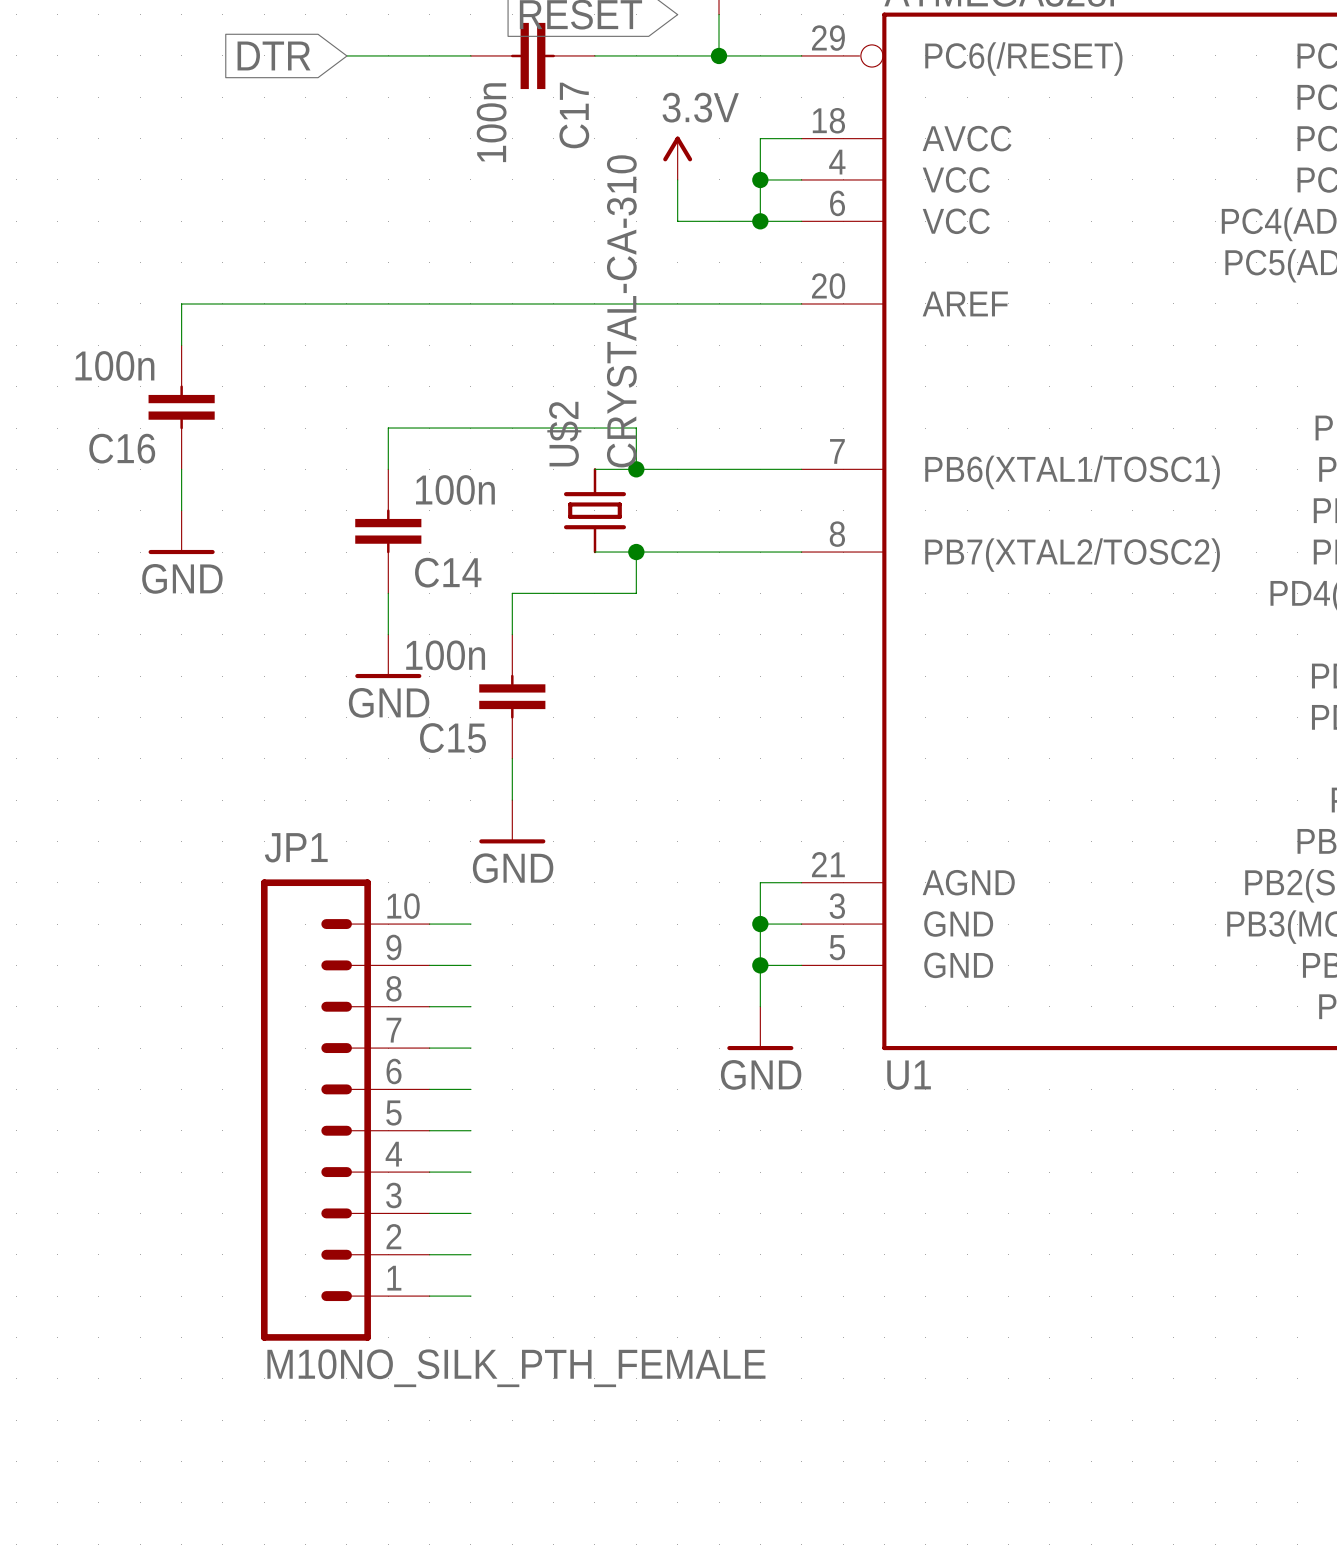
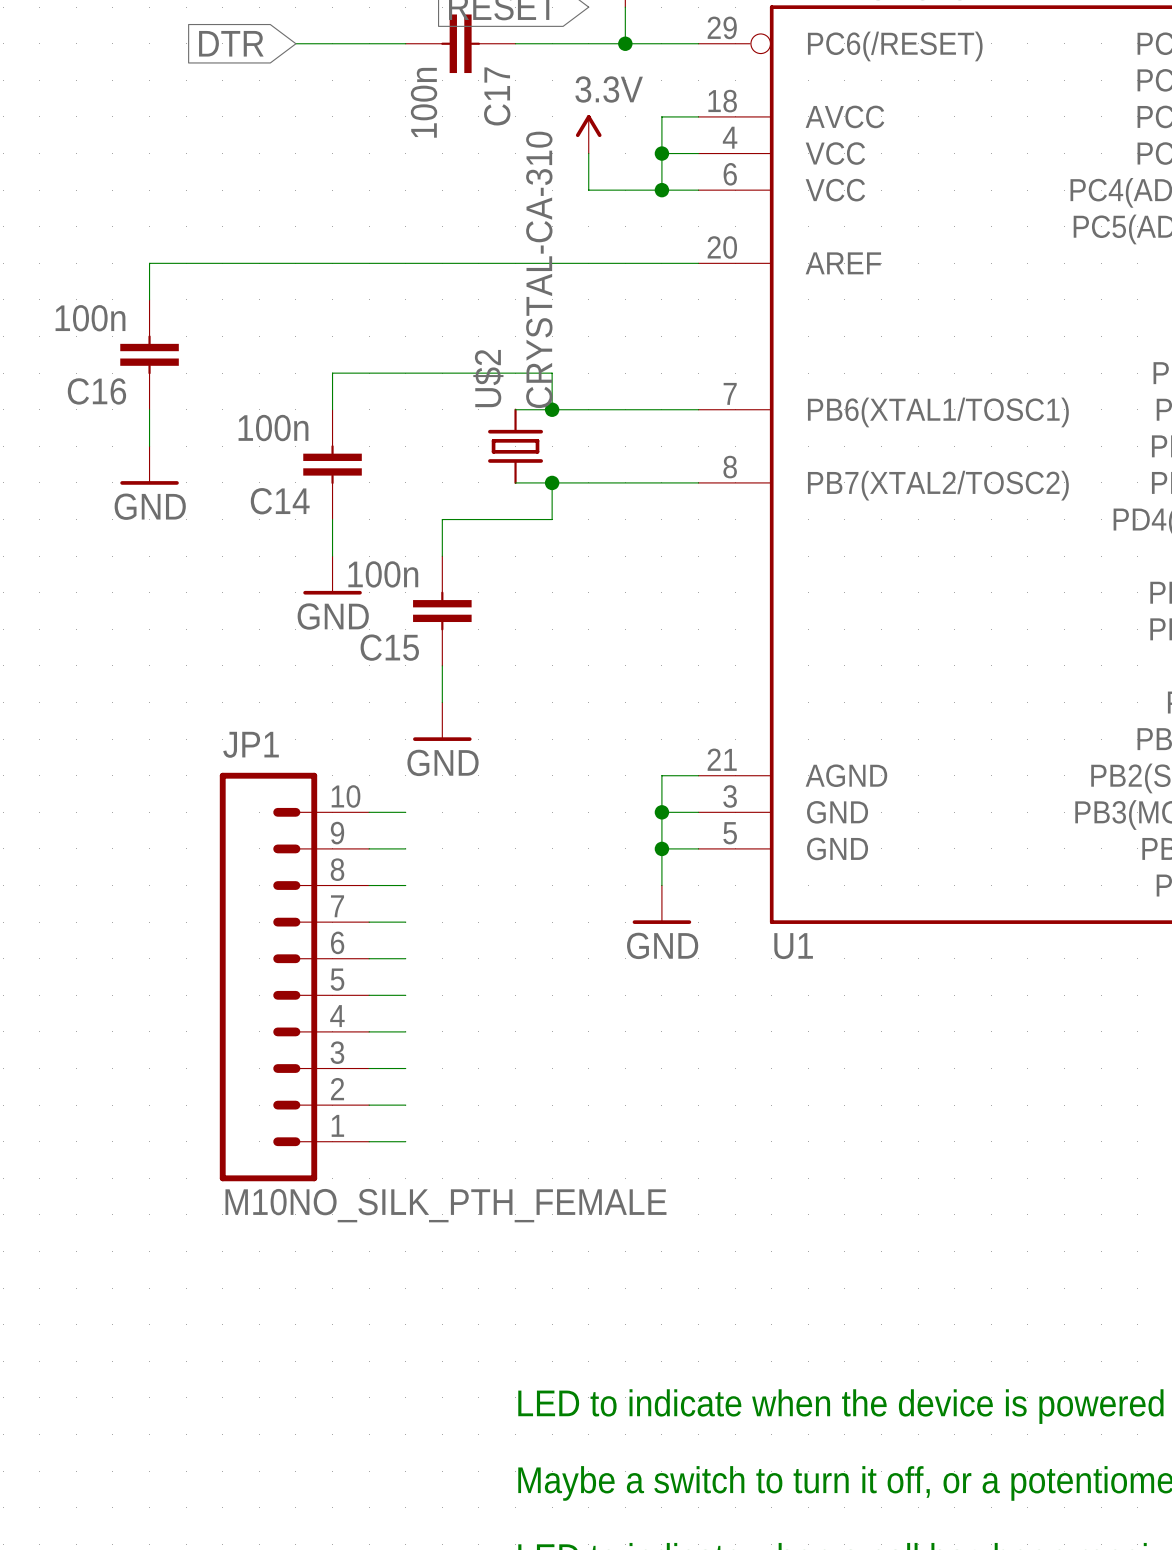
C14 value position: 100n (455, 490) -> 100n (273, 428)
C14 name position: C14 (448, 572) -> C14 (280, 501)

